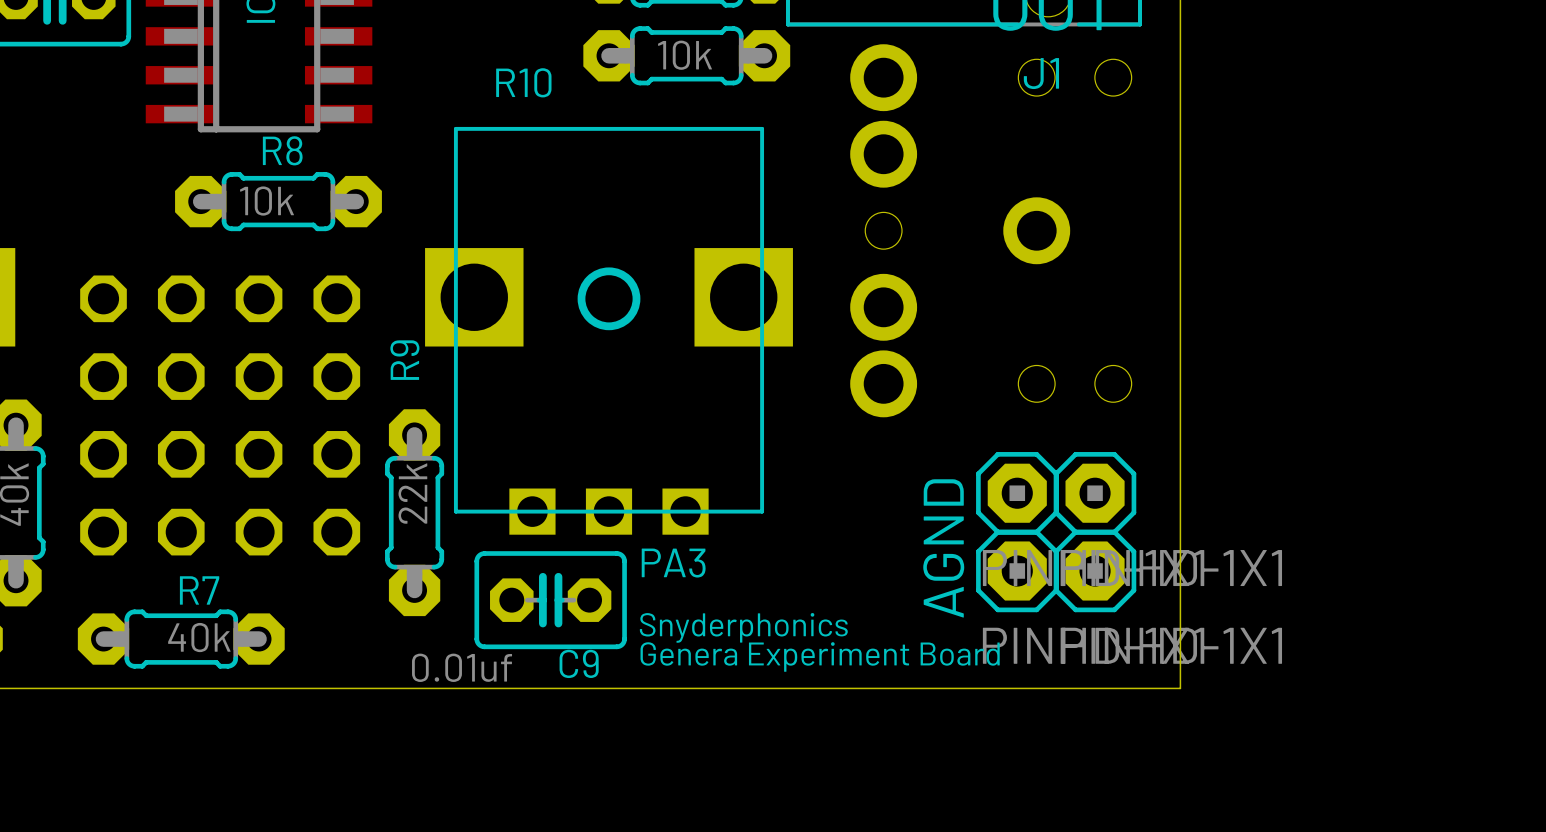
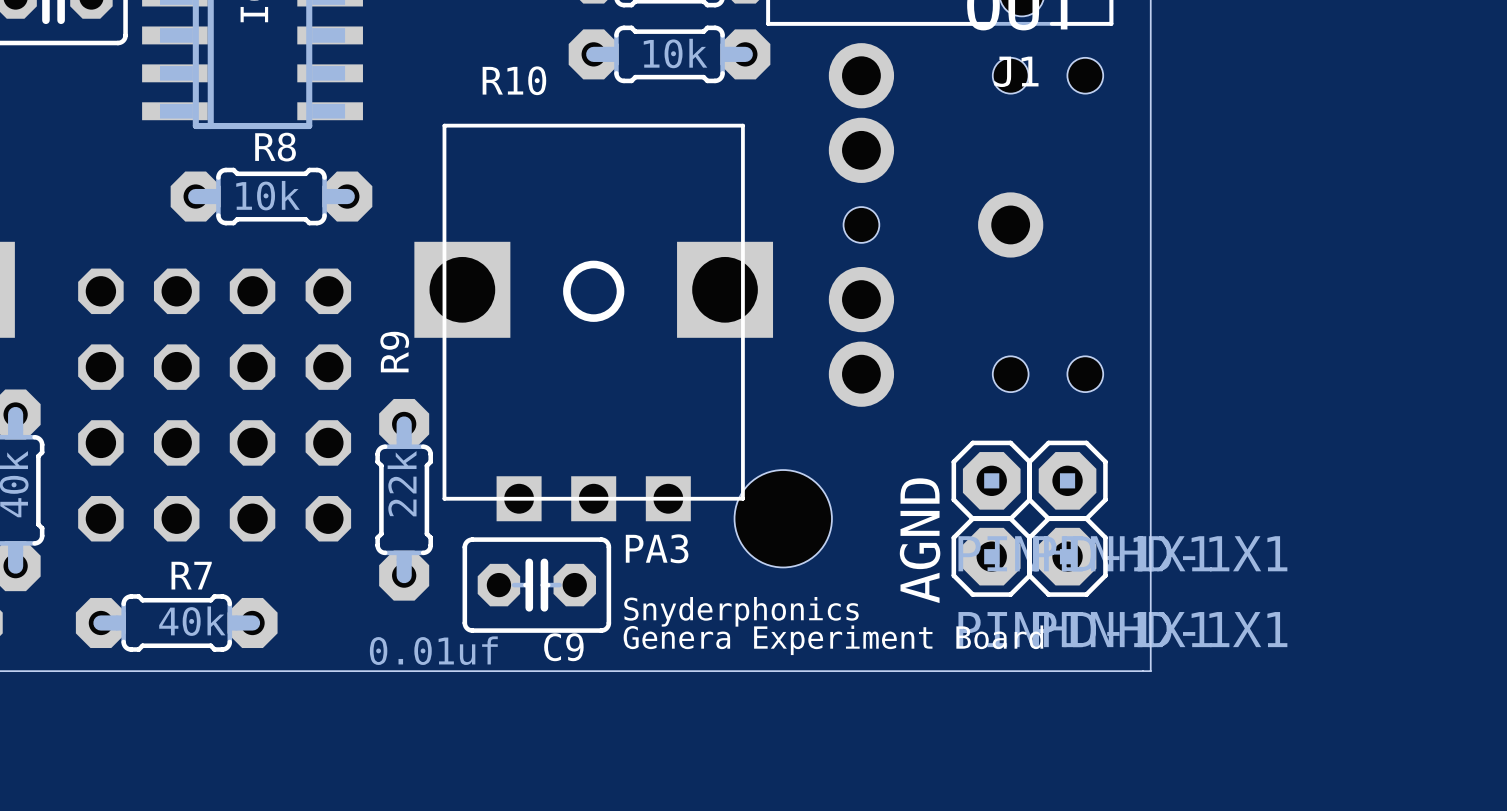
part: none -> (783, 518)

